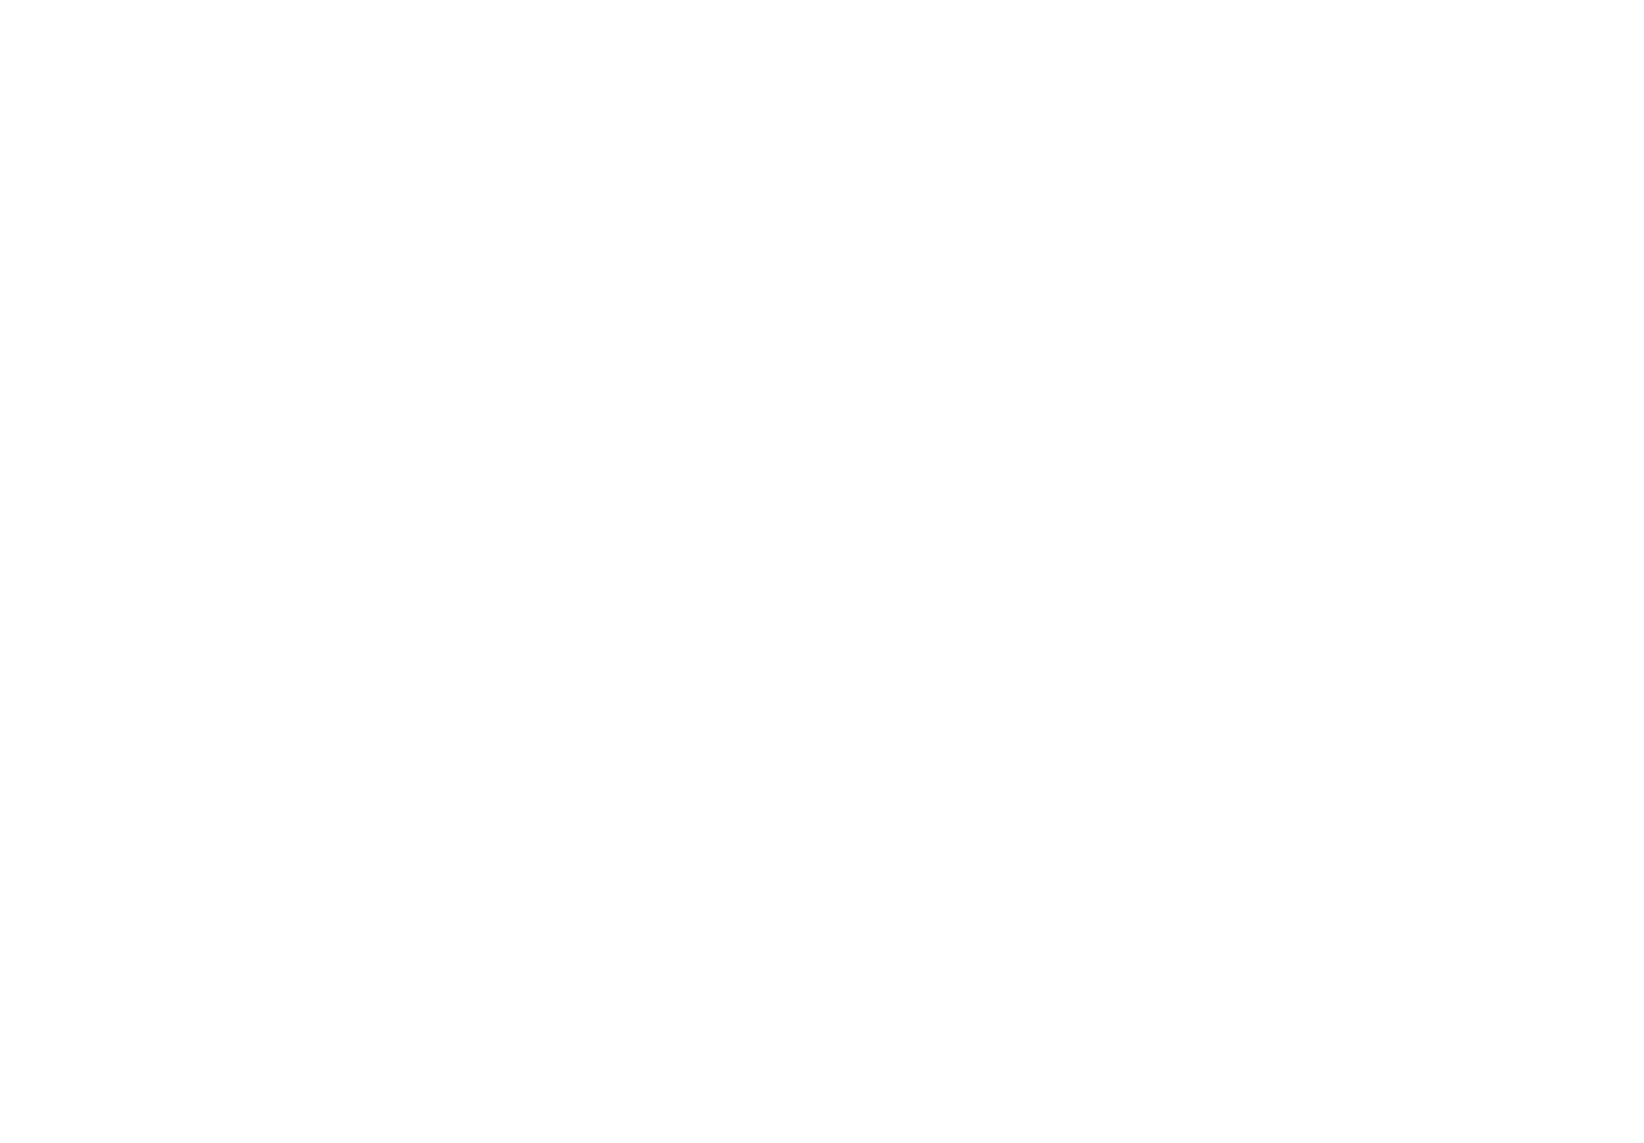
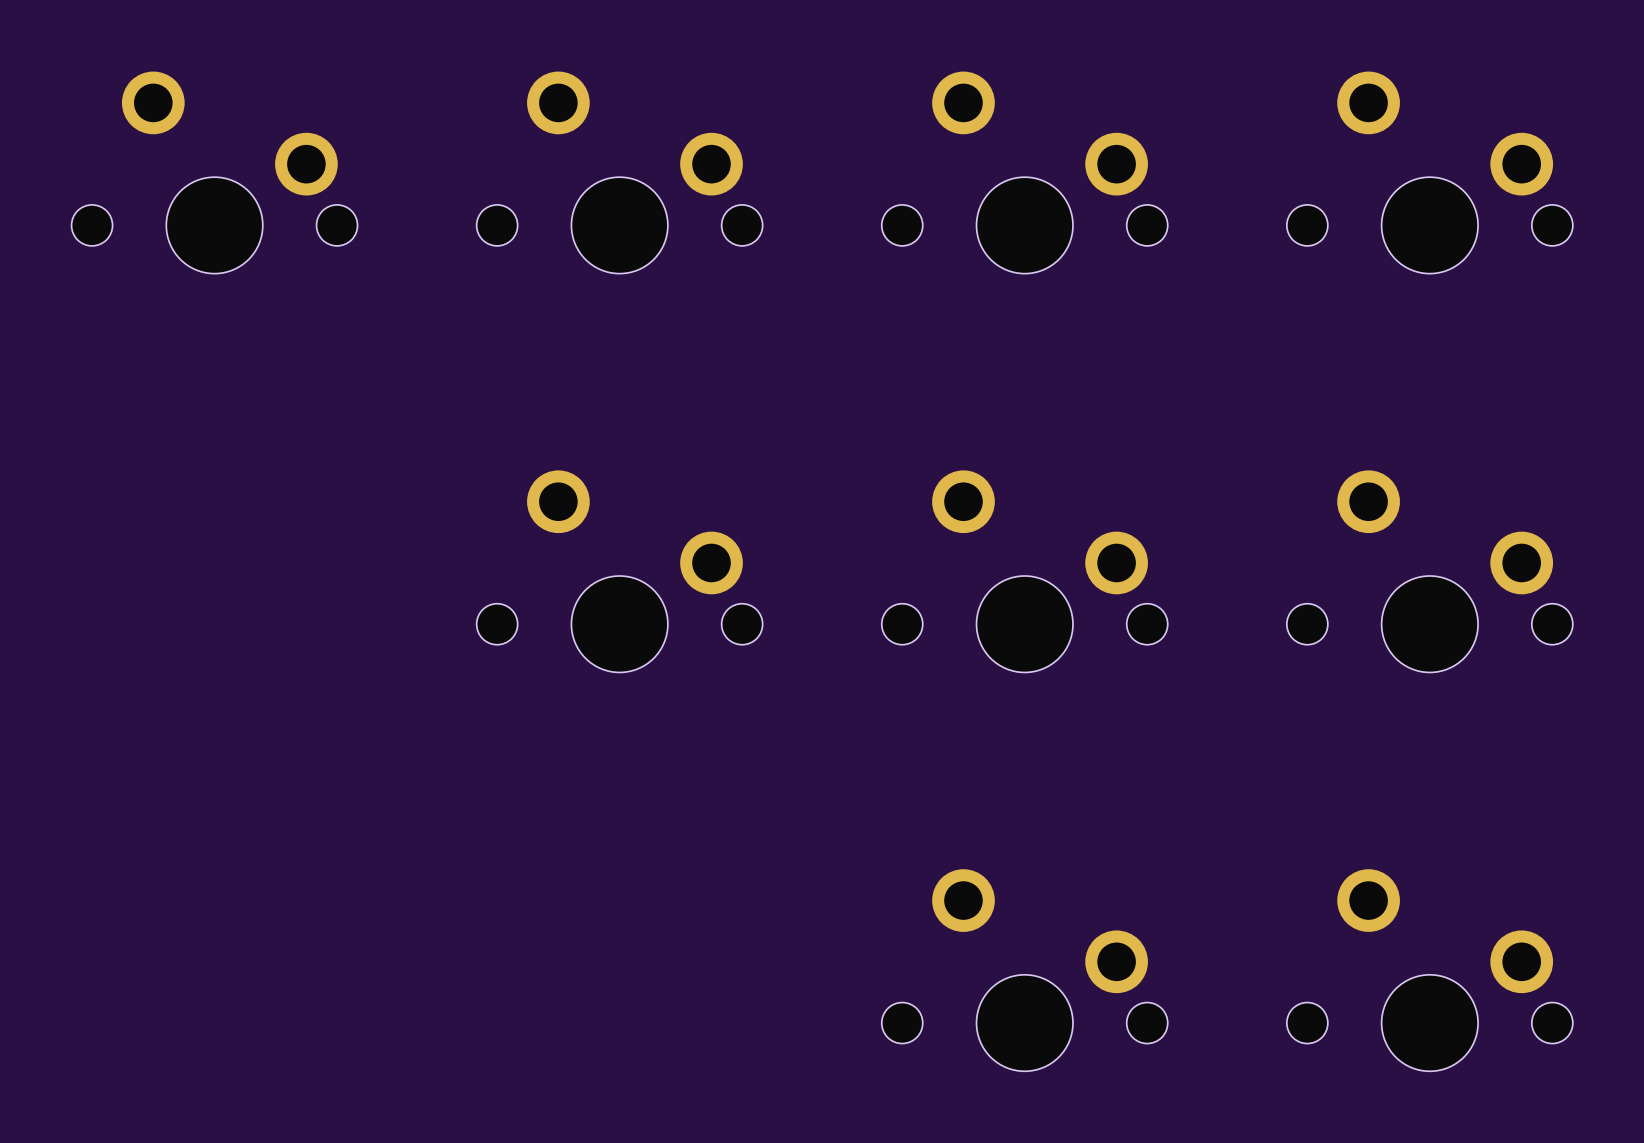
part: none -> (214, 172)
part: none -> (619, 172)
part: none -> (1024, 172)
part: none -> (1429, 172)
part: none -> (619, 571)
part: none -> (1024, 571)
part: none -> (1429, 571)
part: none -> (1024, 970)
part: none -> (1429, 970)

